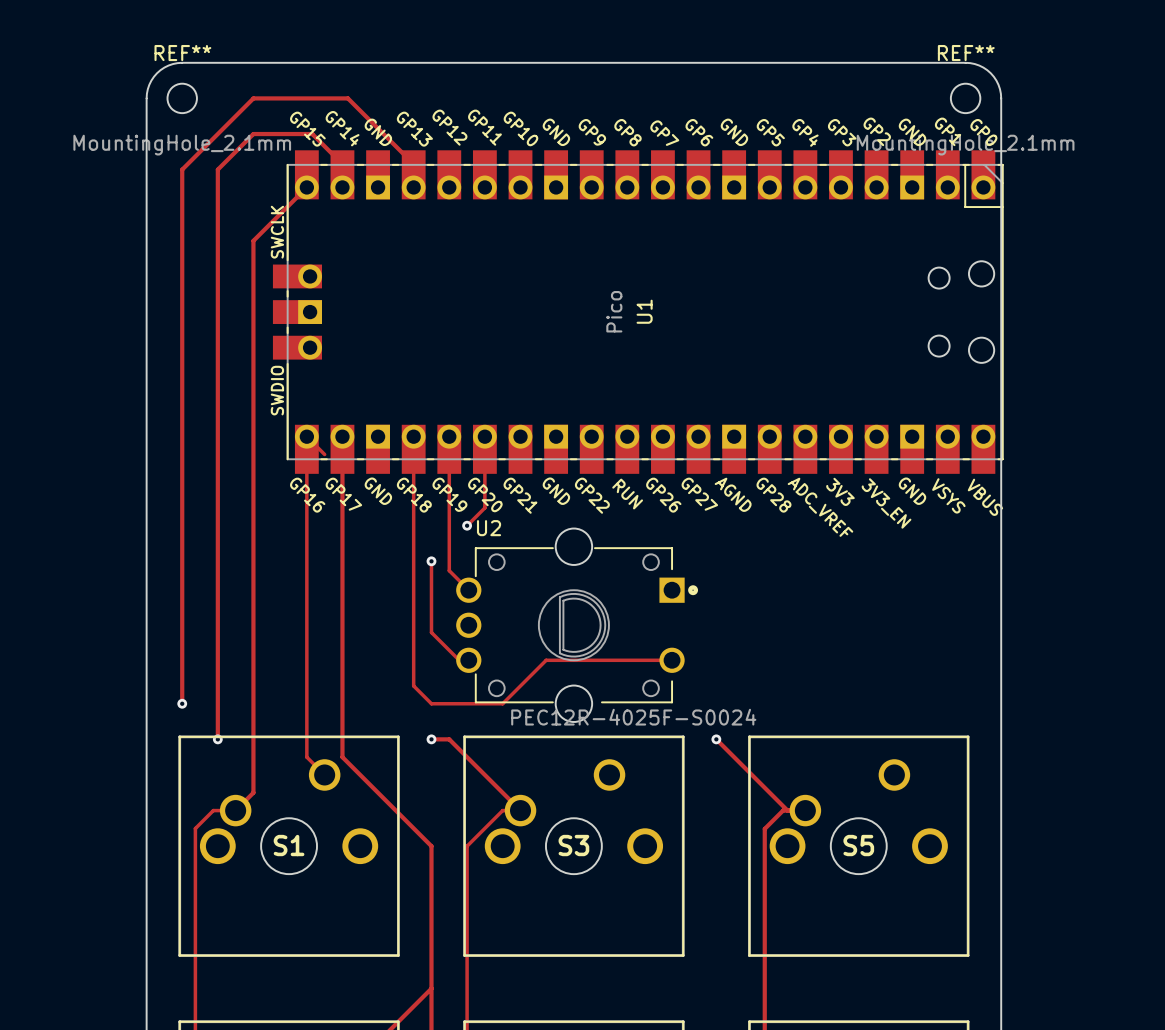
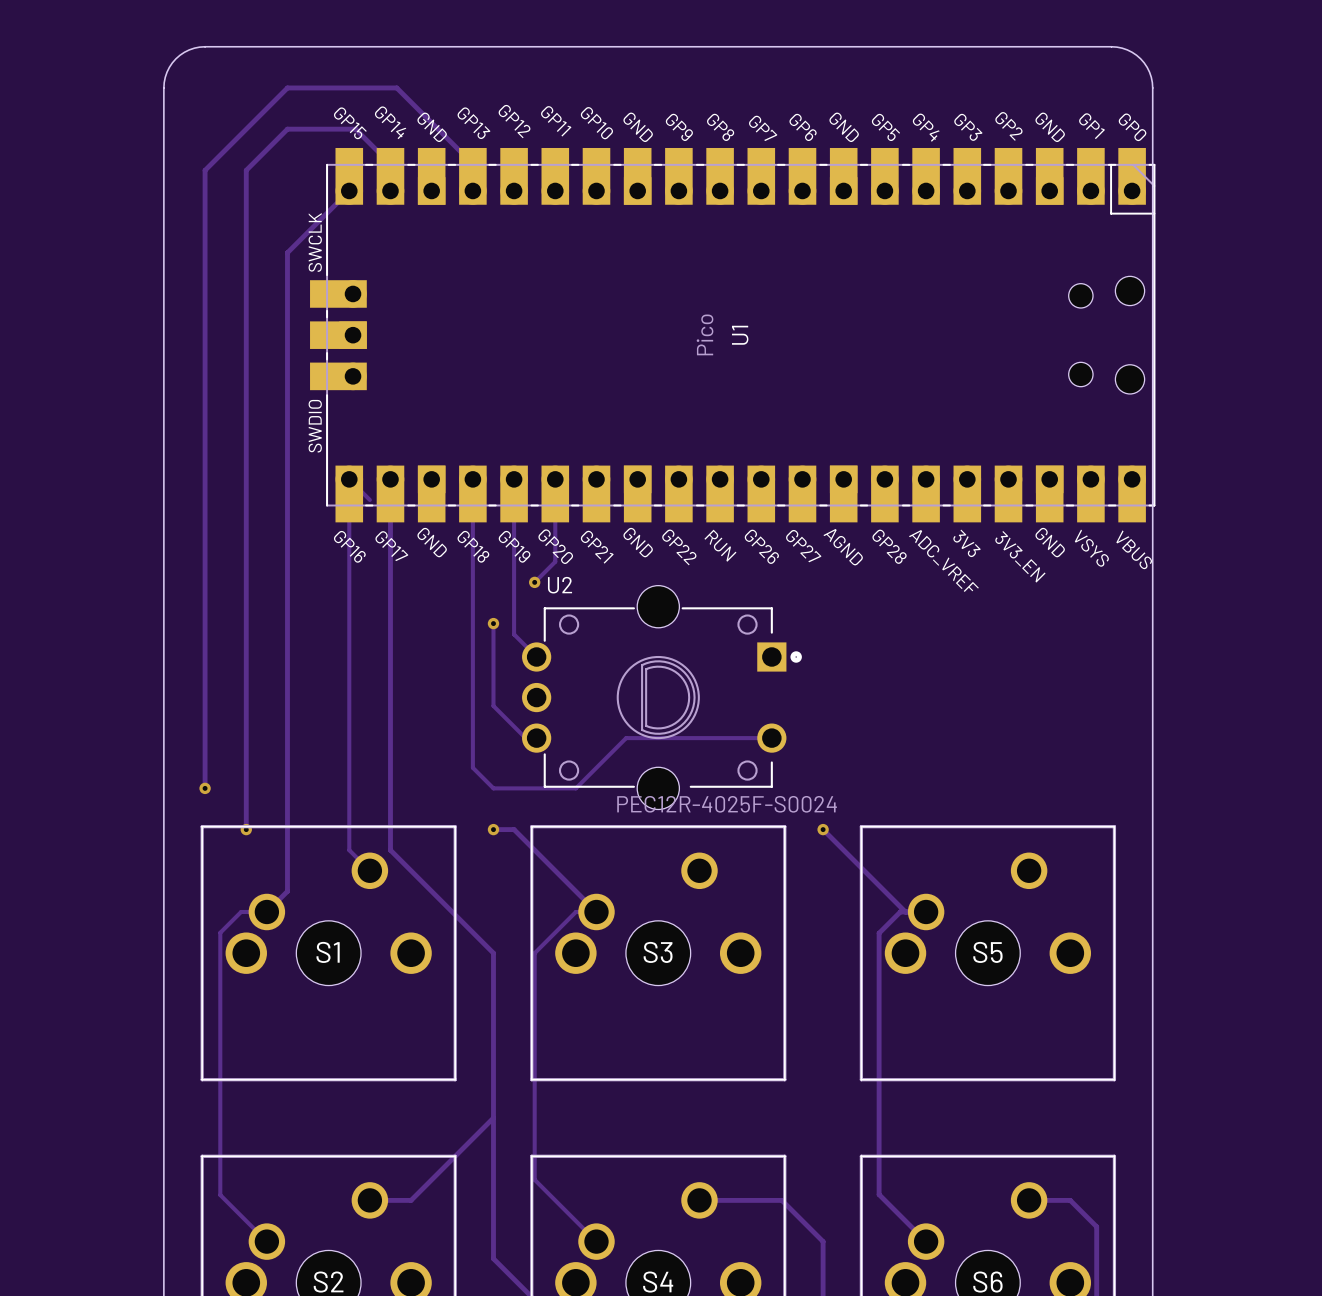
REF**: MountingHole_2.1mm (182, 98) -> none
REF**: MountingHole_2.1mm (965, 98) -> none

